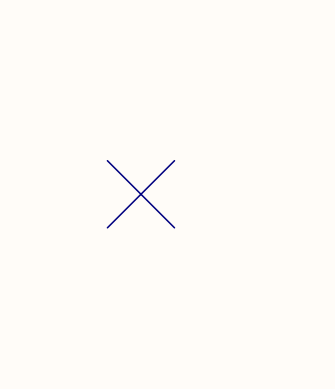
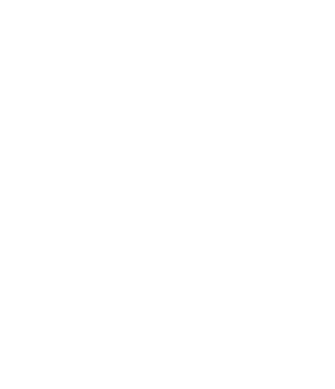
no-connect mark: (140, 194) -> none

